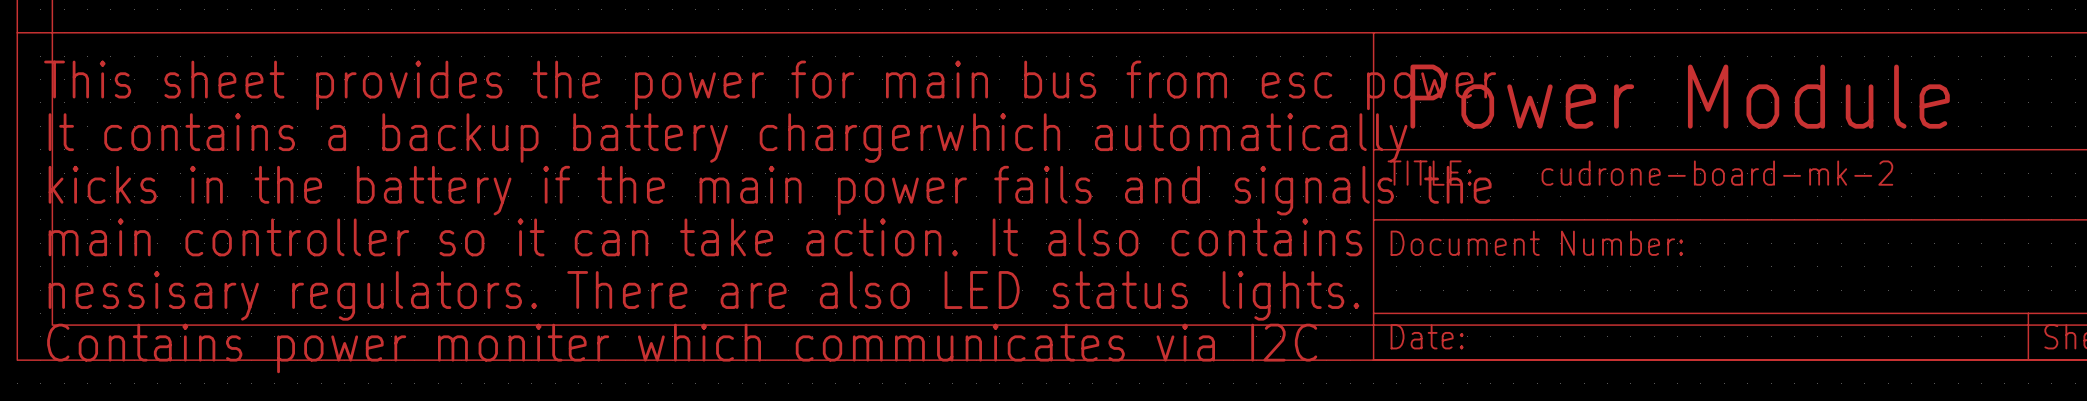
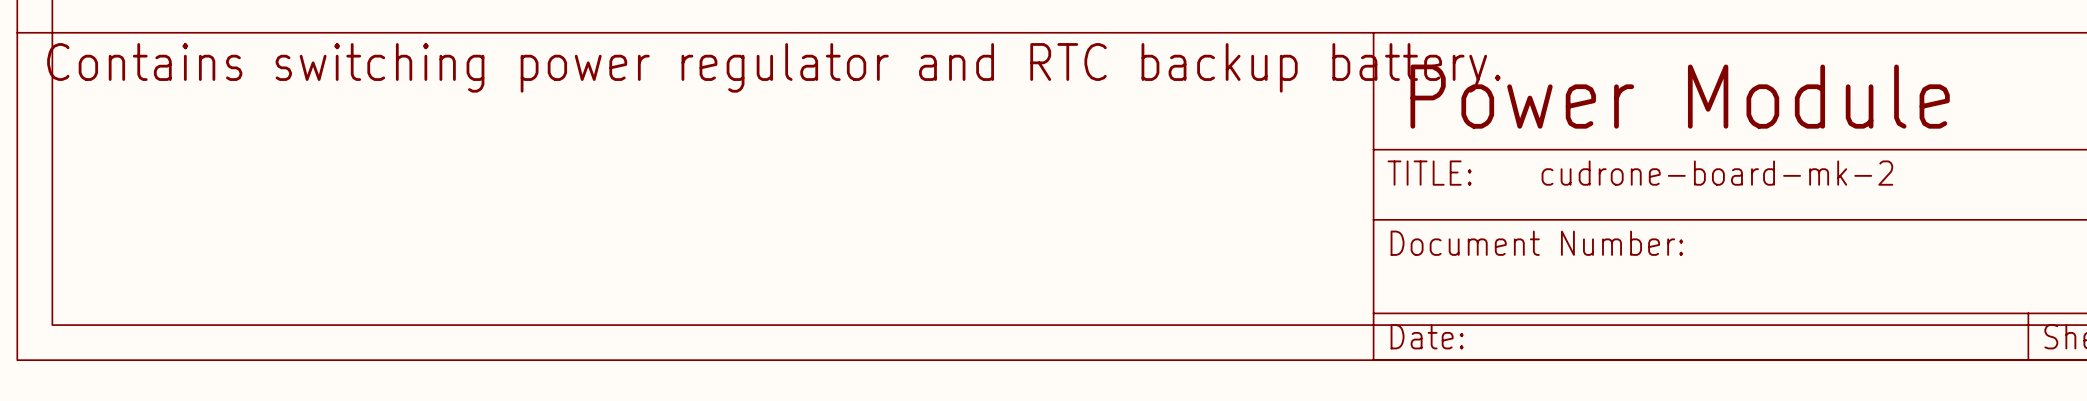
text: none -> Contains switching power regulator and RTC backup battery. (773, 67)
text: This sheet provides the power for main bus from esc power (770, 85) -> none
text: It contains a backup battery chargerwhich automatically (728, 138) -> none
text: kicks in the battery if the main power fails and signals the (770, 190) -> none
text: main controller so it can take action. It also contains (705, 237) -> none
text: nessisary regulators. There are also LED status lights. (703, 295) -> none
text: Contains power moniter which communicates via I2C (682, 348) -> none

